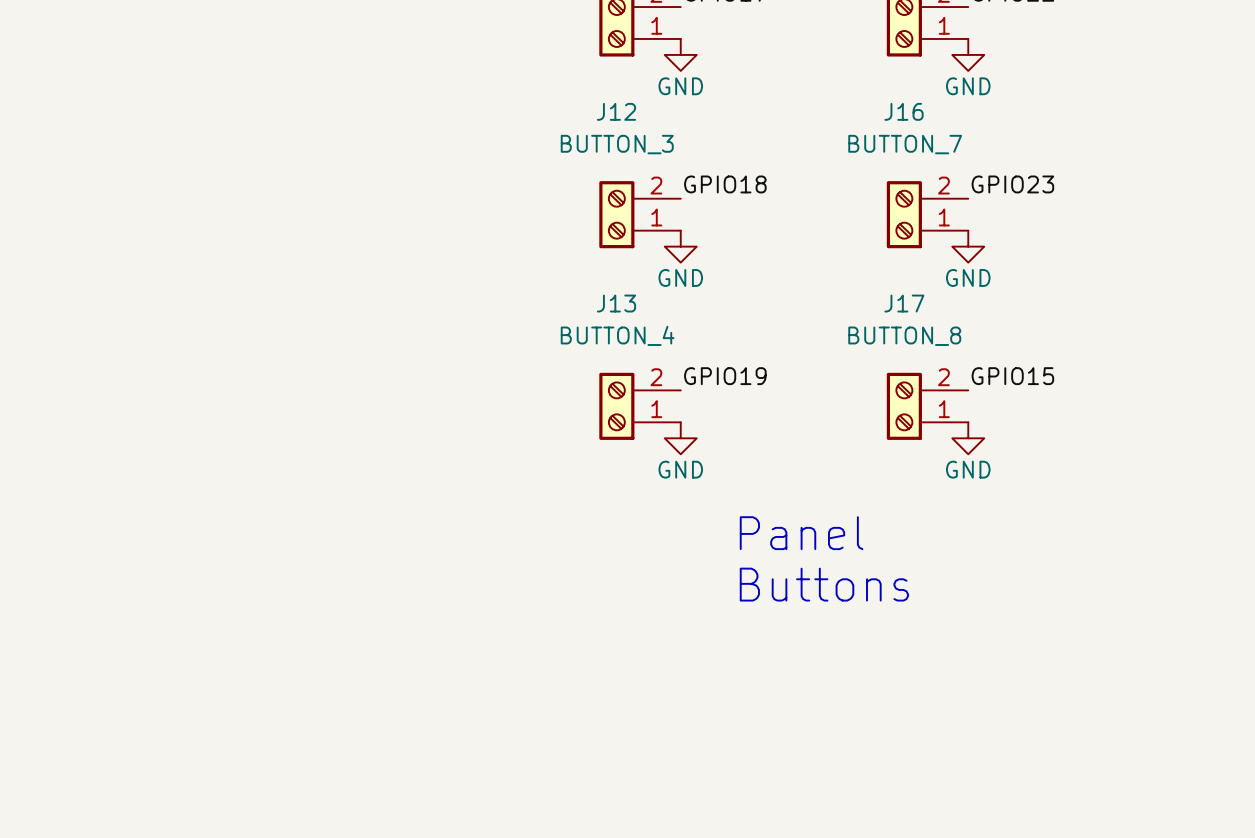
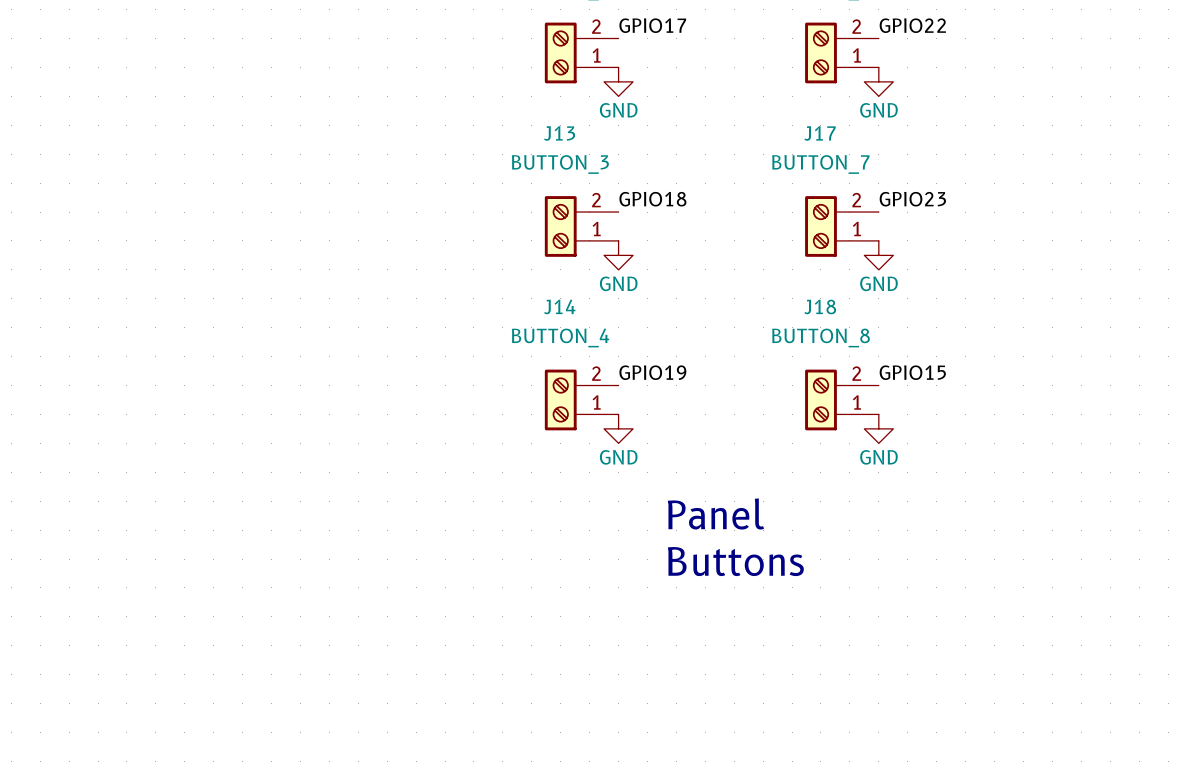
J12 name: J12 (616, 111) -> J13 (559, 133)
J16 name: J16 (904, 111) -> J17 (820, 133)
J13 name: J13 (616, 303) -> J14 (559, 306)
J17 name: J17 (904, 303) -> J18 (820, 306)

